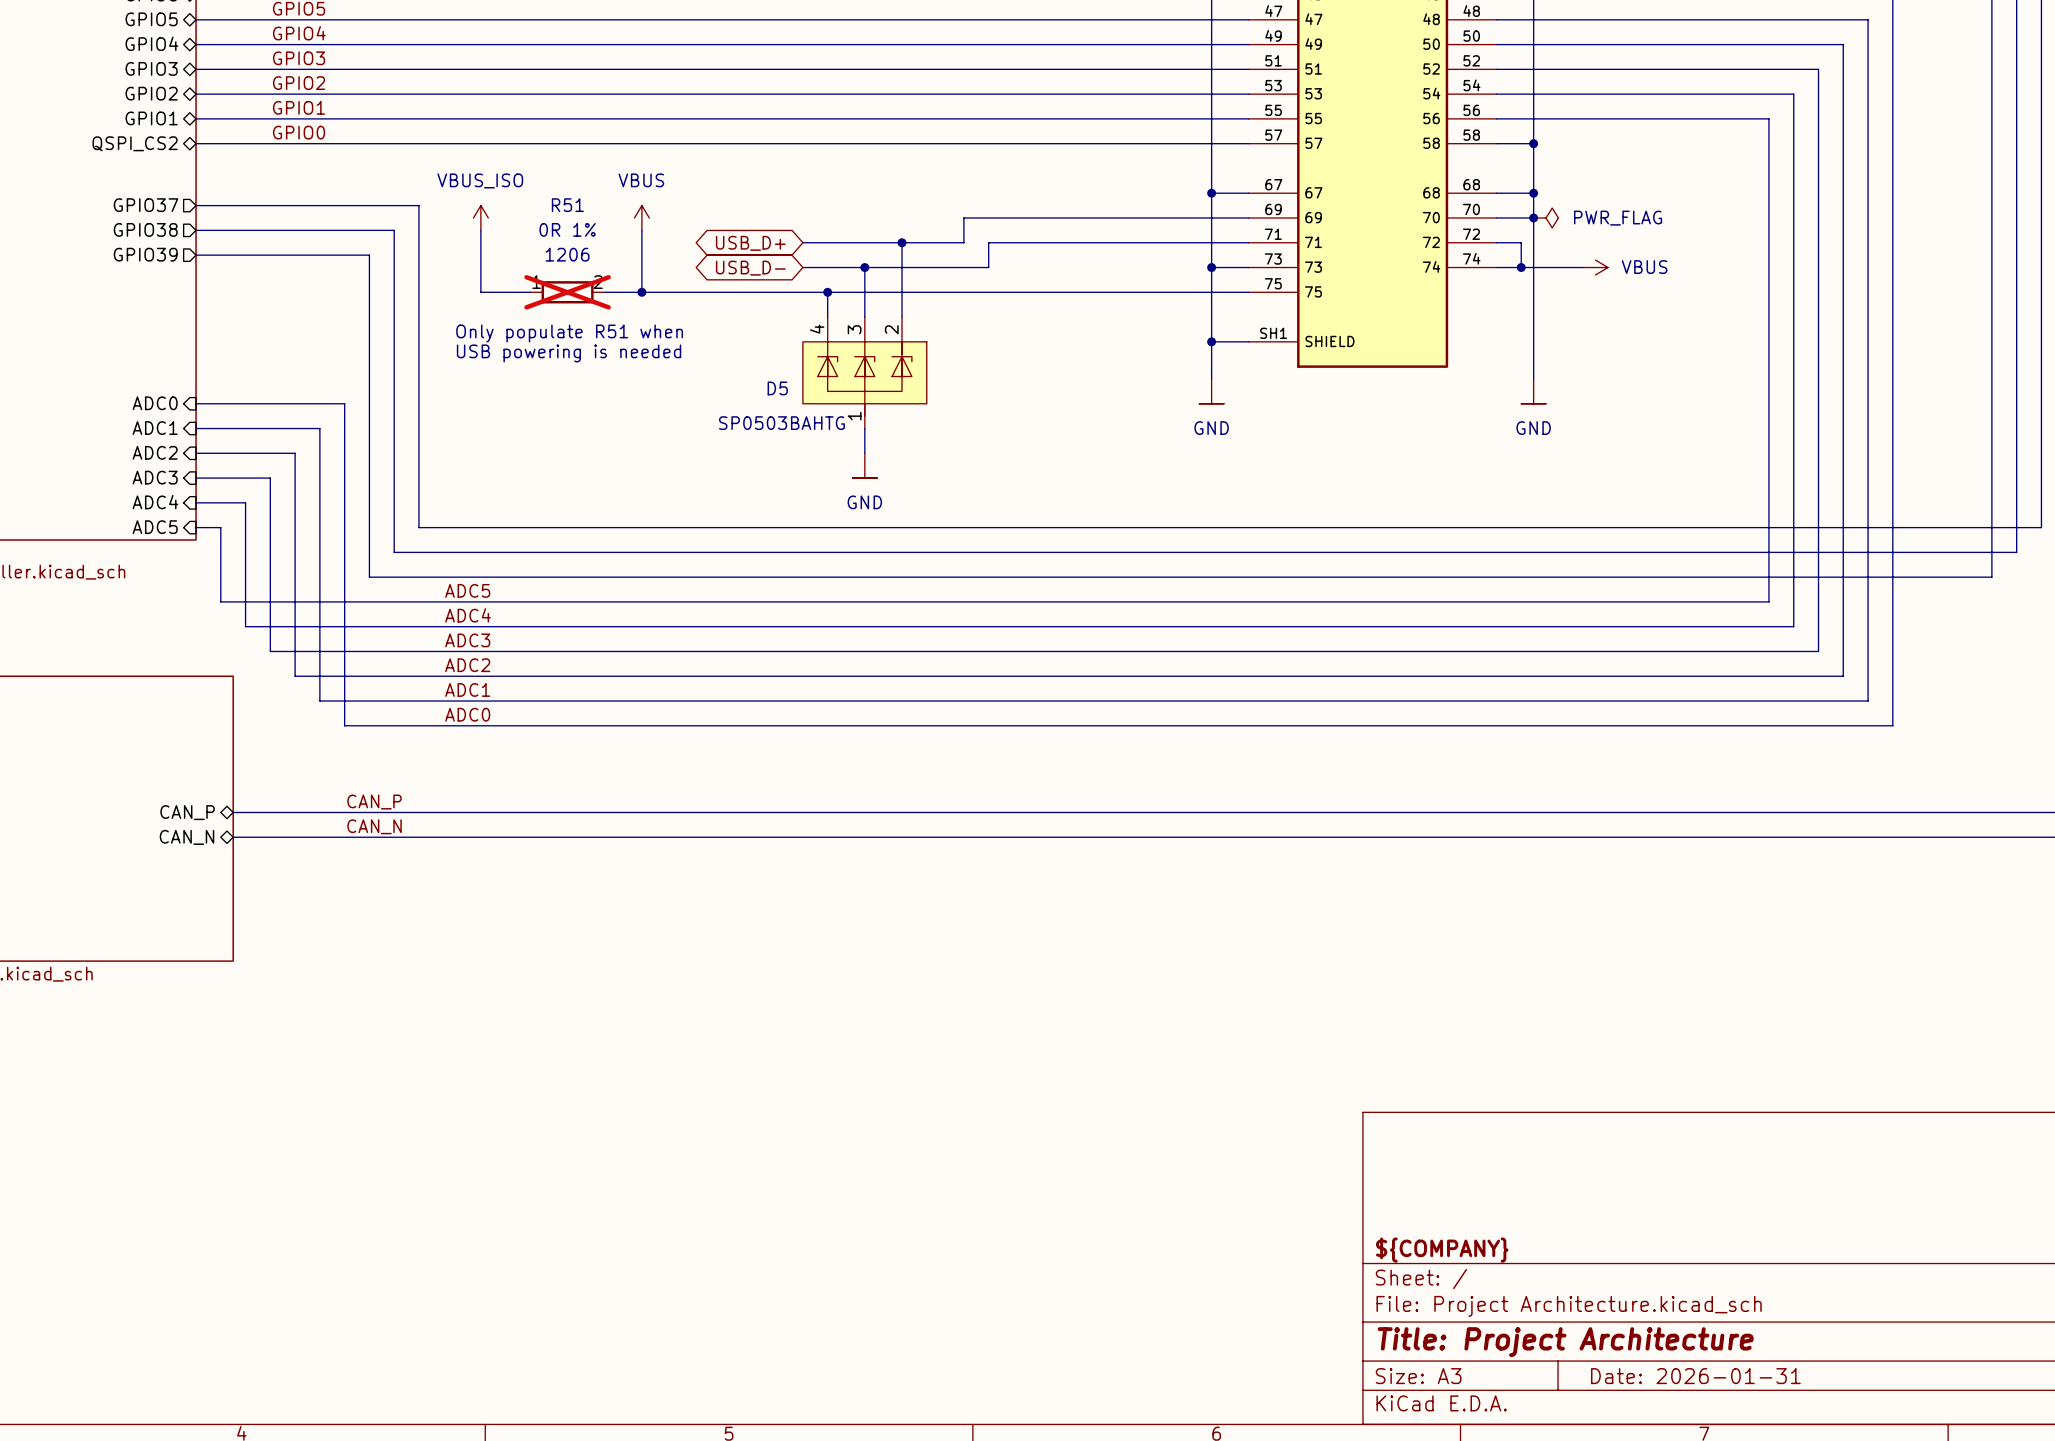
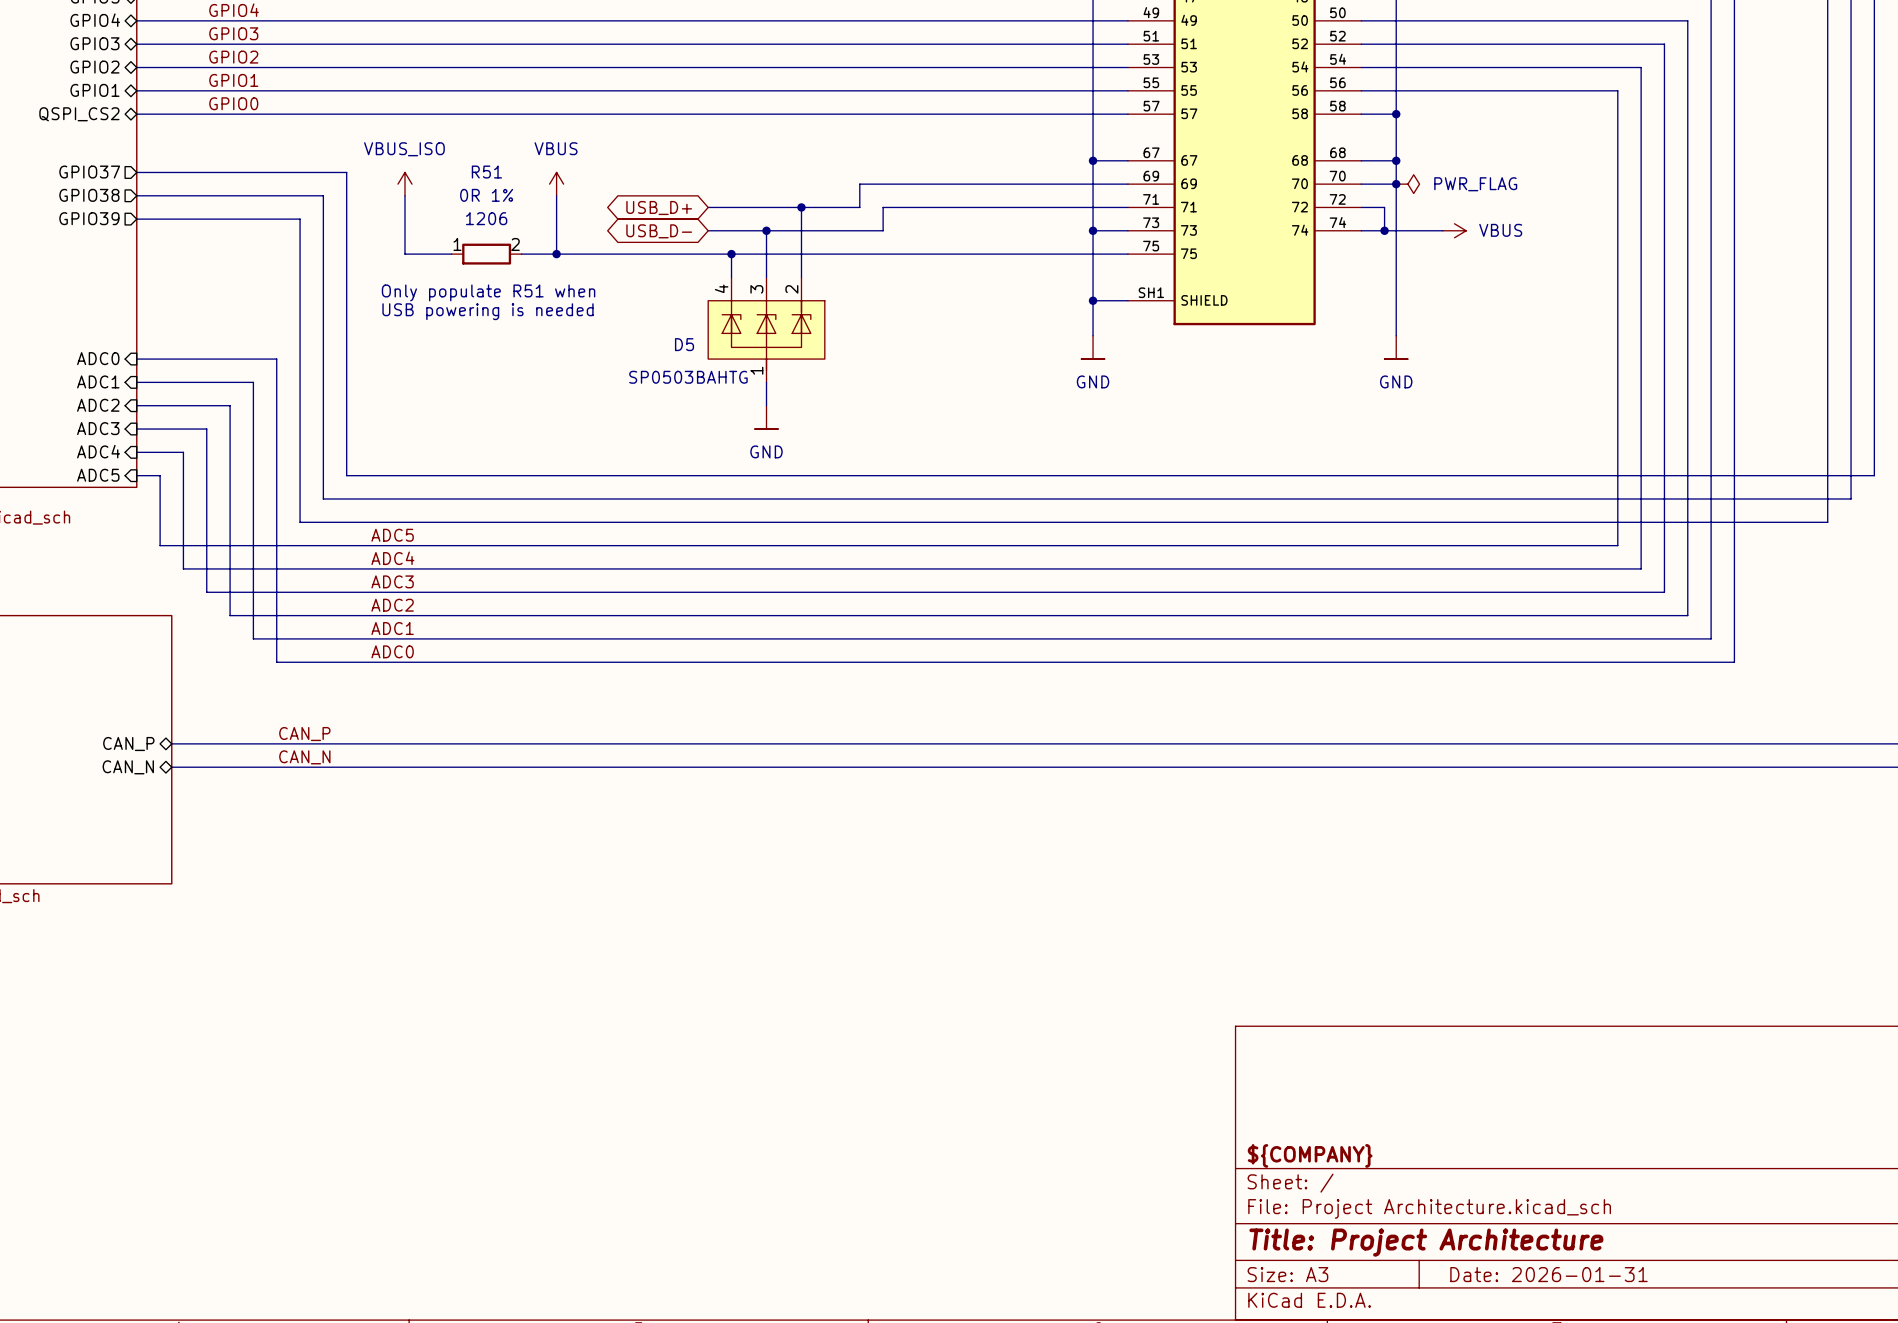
R51 do-not-place cross: (567, 292) -> none

